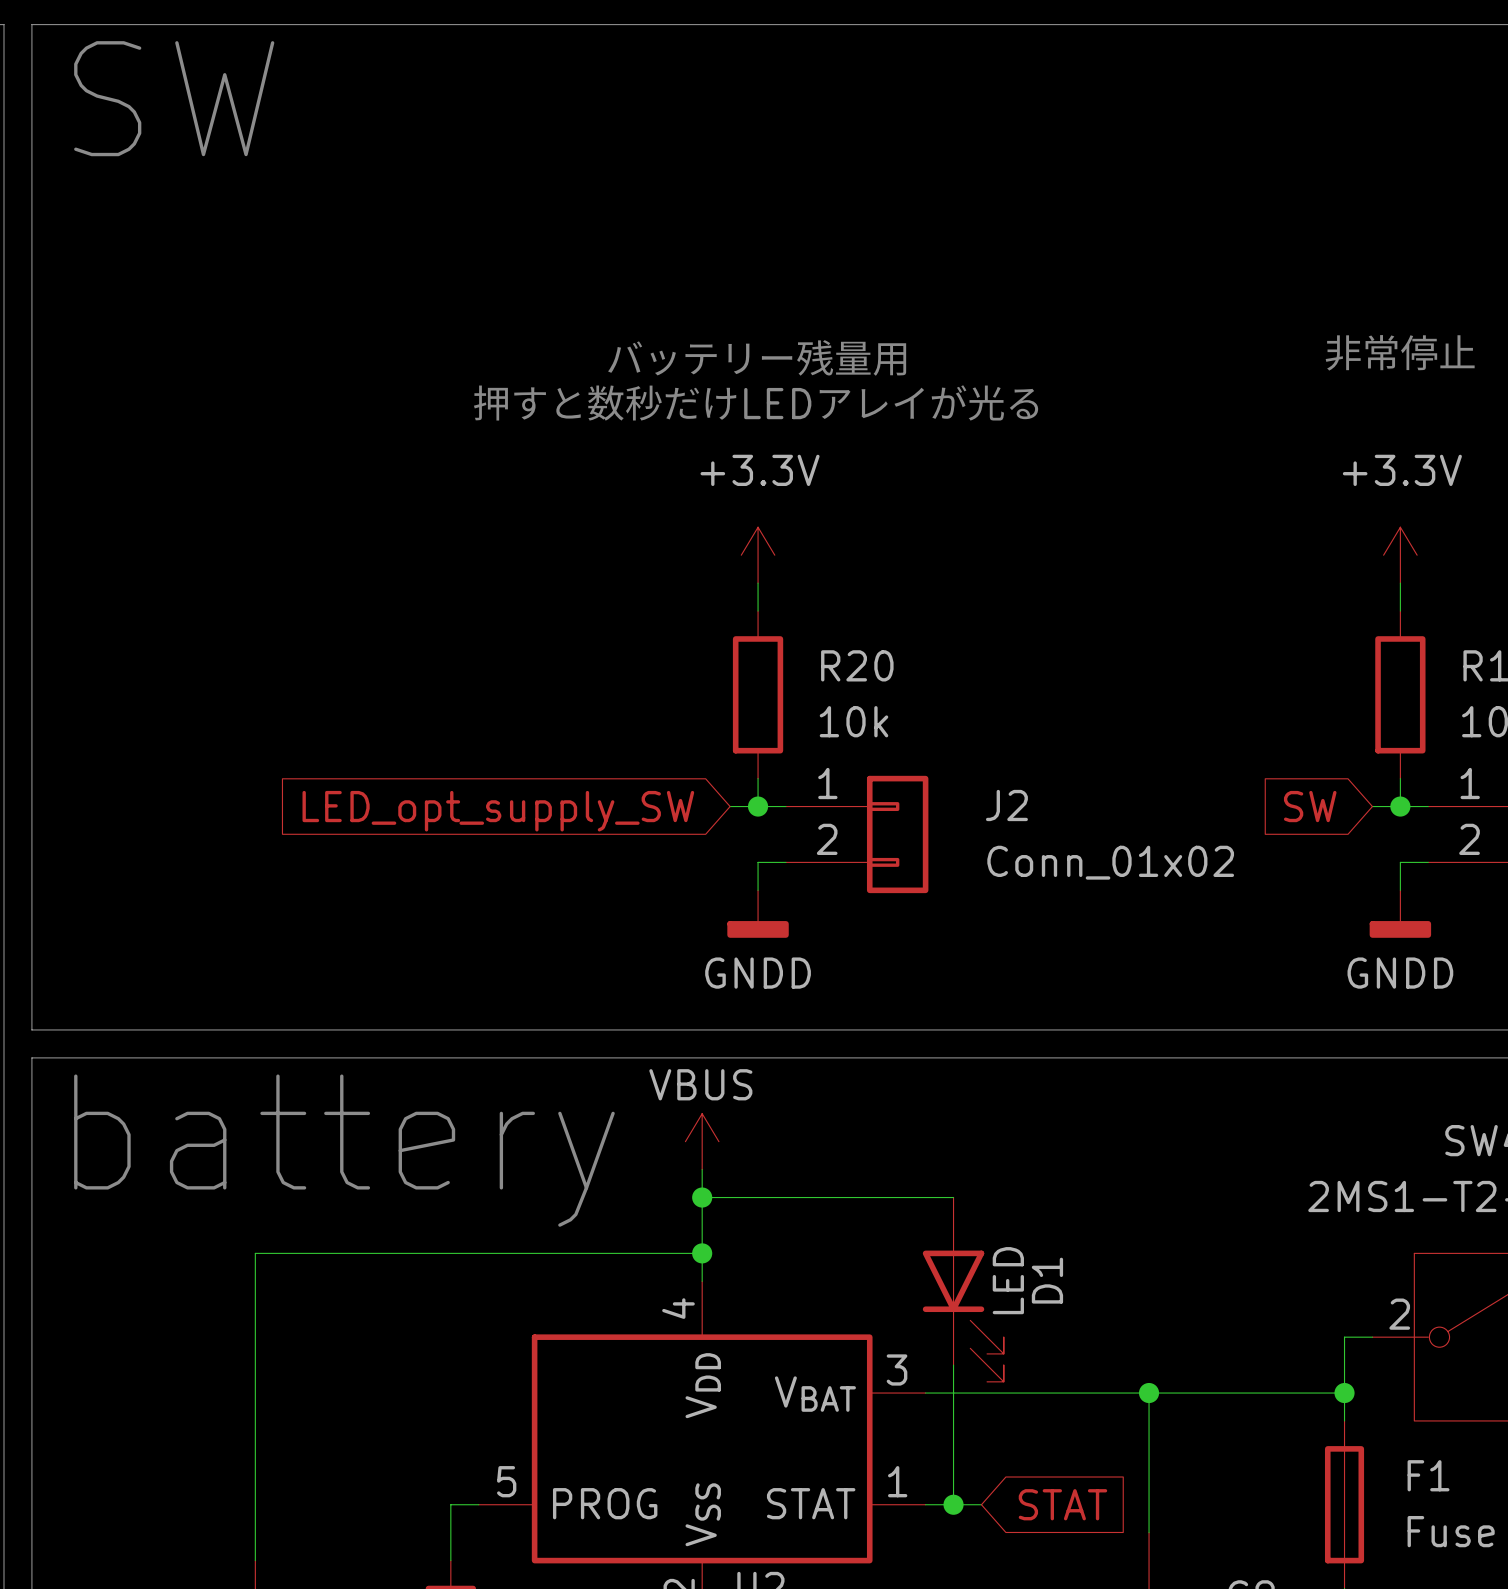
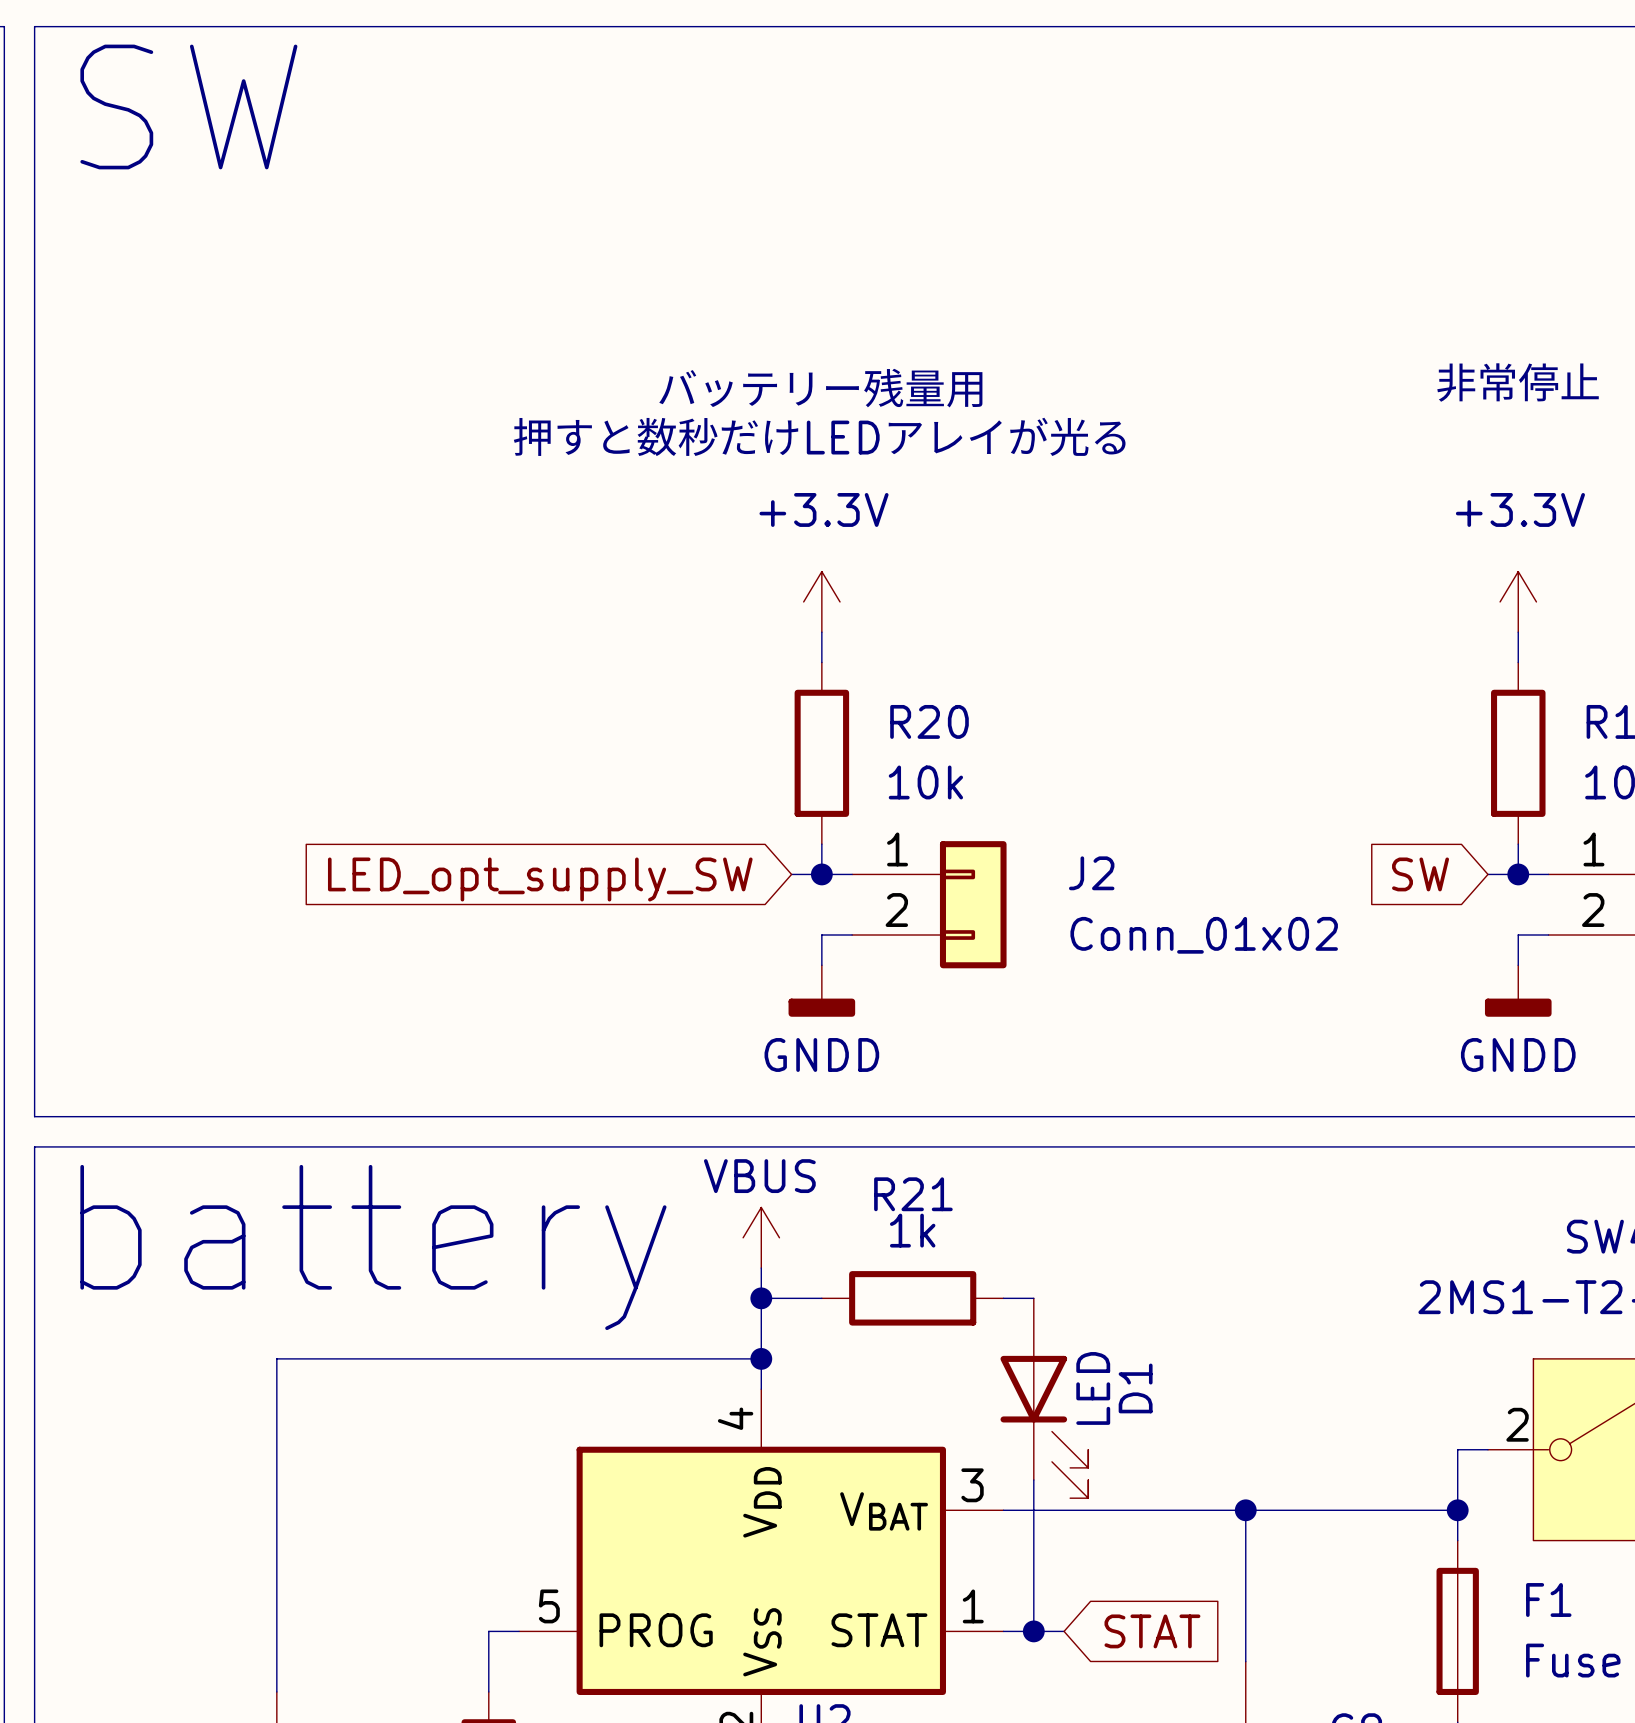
wire: (758, 1197) (925, 1197) -> none
R21: none -> 1k (912, 1298)

